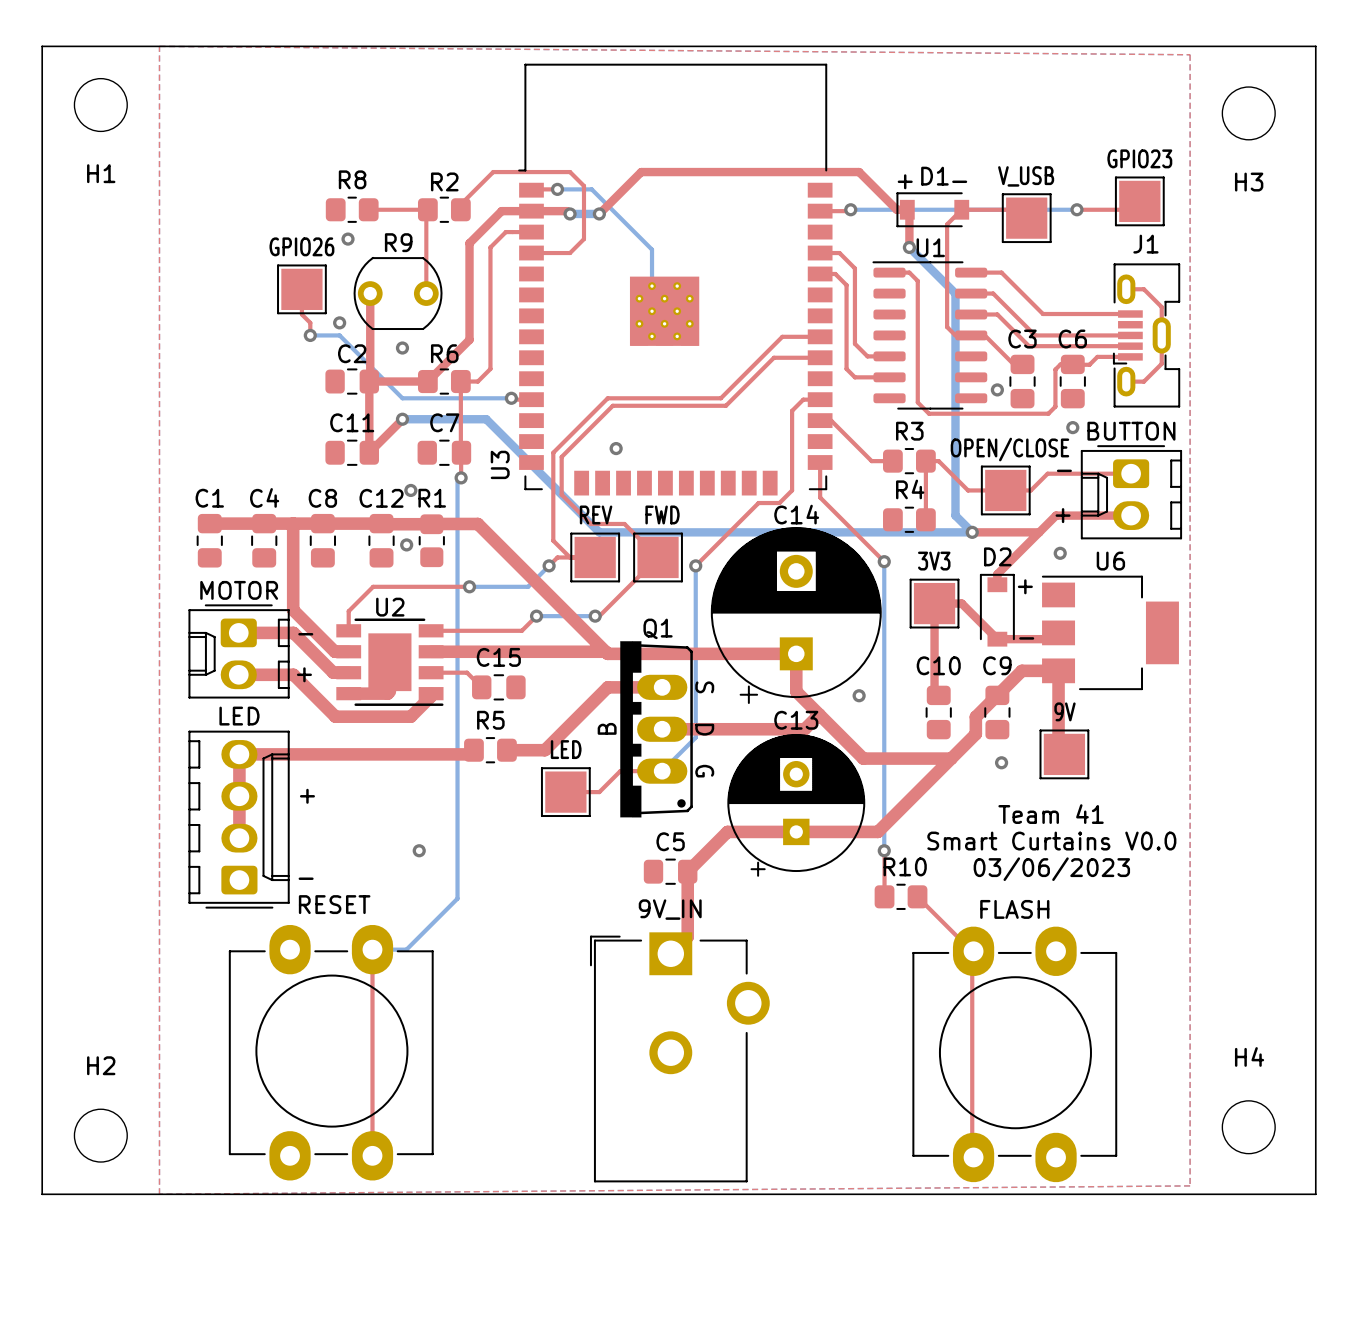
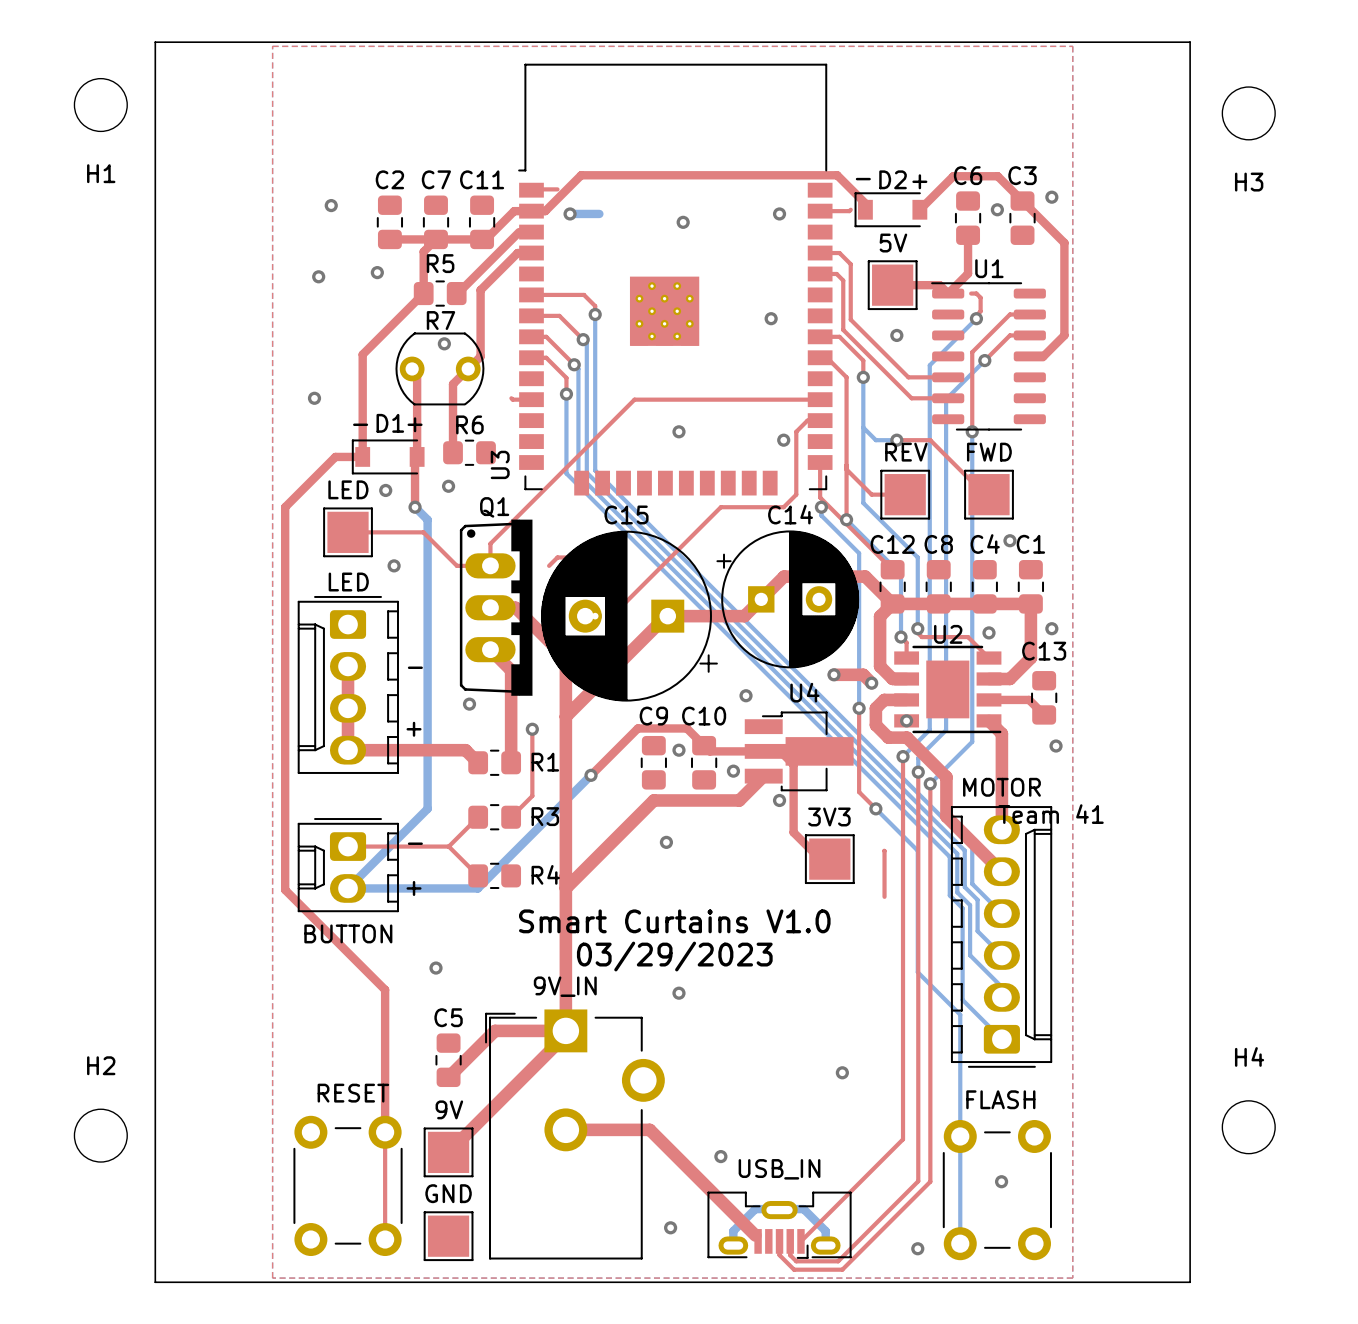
board edge: (42, 46) (1315, 46) (1315, 1194) (42, 1194) (42, 46) -> (155, 42) (155, 1282) (1190, 1282) (1190, 42) (155, 42)
top zone outline: (159, 46) (159, 1194) (1190, 1185) (1190, 54) (159, 46) -> (272, 46) (272, 1278) (1072, 1278) (1072, 46) (272, 46)
text: GPIO23 (1139, 158) -> none
text: V_USB (1026, 176) -> none
D1 text position: + (905, 181) -> + (415, 424)
D1 text position: - (959, 181) -> - (360, 424)
bottom track: (557, 189) (591, 189) (652, 249) (652, 286) -> none
via: (557, 189) -> none
part: (1139, 201) -> none
via: none -> (331, 205)
R8: (352, 209) -> none
top track: (368, 209) (427, 209) (426, 211) (426, 293) -> none
R2: (444, 209) -> none
top track: (460, 209) (460, 204) (493, 172) (570, 172) (583, 185) (583, 239) (570, 253) (531, 253) -> (453, 452) (453, 384) (480, 356) (480, 290) (517, 253) (531, 253)
bottom track: (850, 209) (1076, 209) -> none
via: (850, 209) -> none
top track: none -> (919, 209) (953, 176) (997, 176) (1064, 242) (1064, 335) (1043, 356) (1029, 356)
D1 position: (932, 209) -> (388, 456)
via: none -> (997, 209)
top track: (1076, 209) (1131, 209) -> none
via position: (1076, 209) -> (1051, 197)
top track: (514, 211) (501, 211) (469, 243) (469, 339) (427, 381) (369, 381) -> (514, 211) (485, 239) (389, 239)
top track: (545, 211) (567, 211) (570, 213) -> (545, 211) (581, 175) (837, 175) (865, 203) (865, 209)
top track: (599, 213) (641, 172) (859, 172) (896, 209) (907, 209) (909, 211) (909, 247) -> none
via: (599, 213) -> none
via: none -> (779, 213)
top track: (1026, 213) (1022, 209) (961, 209) (947, 224) (947, 327) (955, 335) (984, 335) (1013, 364) (1022, 364) -> none
part: (1026, 218) -> none
via: none -> (683, 222)
top track: (519, 232) (505, 232) (490, 247) (490, 368) (477, 381) (460, 381) (461, 477) -> (519, 232) (456, 293)
top track: none -> (968, 235) (968, 273) (948, 293) (939, 285) (892, 285)
via: (348, 239) -> none
top track: none -> (435, 239) (423, 251) (423, 293) (362, 354) (362, 456) (335, 456) (285, 507) (285, 889) (385, 989) (385, 1239)
text: GPIO26 (301, 246) -> none
bottom track: (909, 247) (955, 293) (955, 515) (972, 532) (599, 532) (486, 419) (402, 419) -> none
via: (909, 247) -> none
top track: (850, 264) (854, 268) (854, 343) (867, 356) (889, 356) -> (850, 264) (850, 319) (908, 377) (948, 377)
via: none -> (377, 272)
top track: (889, 272) (909, 272) (917, 280) (917, 402) (929, 413) (1048, 413) (1055, 406) (1055, 369) (1060, 364) (1089, 364) (1097, 356) (1130, 356) -> none
top track: (971, 272) (1001, 272) (1042, 314) (1130, 314) -> none
top track: (835, 273) (846, 285) (846, 368) (854, 377) (889, 377) -> (835, 273) (843, 280) (843, 329) (911, 398) (948, 398)
via: none -> (318, 276)
part: none -> (892, 285)
top track: (301, 289) (301, 314) (310, 322) (310, 335) -> none
part: (301, 289) -> none
top track: (1126, 289) (1143, 289) (1161, 307) (1161, 363) (1143, 381) (1126, 381) -> none
top track: (370, 293) (369, 381) -> none
R9: (398, 293) -> none
top track: (976, 293) (993, 293) (1035, 335) (1130, 335) -> (976, 293) (980, 297) (980, 311) (976, 315) (976, 318)
top track: none -> (531, 294) (583, 294) (595, 306) (595, 314)
bottom track: none -> (595, 314) (595, 470) (972, 847) (972, 883) (1001, 913)
via: none -> (595, 314)
top track: (971, 314) (997, 314) (1029, 346) (1130, 346) -> none
top track: none -> (1029, 314) (1009, 314) (972, 352) (972, 431)
top track: none -> (531, 315) (559, 315) (583, 339)
via: none -> (771, 318)
bottom track: none -> (976, 318) (929, 365) (929, 729) (903, 756)
via: none -> (976, 318)
via: (339, 322) -> none
bottom track: (310, 335) (339, 335) (402, 398) (511, 398) -> none
via: (310, 335) -> none
via: none -> (896, 335)
U1 position: (929, 335) -> (988, 356)
top track: none -> (1029, 335) (1009, 335) (984, 360)
J1: (1146, 335) -> none
top track: none -> (531, 336) (546, 336) (574, 364)
top track: (820, 336) (782, 336) (720, 398) (607, 398) (553, 452) (553, 540) (570, 557) -> (820, 336) (839, 336) (863, 360) (863, 377)
bottom track: none -> (583, 339) (586, 343) (586, 472) (964, 850) (964, 887) (977, 899) (977, 931) (1001, 955)
via: none -> (583, 339)
via: none -> (444, 343)
via: (402, 348) -> none
top track: none -> (531, 357) (546, 357) (566, 377) (566, 394)
top track: (820, 357) (773, 357) (725, 405) (612, 405) (561, 456) (561, 494) (591, 523) (624, 523) (658, 557) (599, 616) (595, 616) -> (820, 357) (826, 357) (846, 377) (846, 519)
bottom track: none -> (984, 360) (946, 399) (946, 730) (918, 758) (918, 772)
via: none -> (984, 360)
bottom track: none -> (574, 364) (578, 368) (578, 474) (957, 853) (957, 892) (970, 905) (970, 955) (1001, 987) (1001, 997)
via: none -> (574, 364)
top track: none -> (412, 368) (417, 373) (415, 507)
R7: none -> (439, 368)
bottom track: none -> (863, 377) (863, 503) (917, 557) (917, 628)
via: none -> (863, 377)
C2 rotation: 0° (352, 381) -> 90° clockwise (389, 222)
C2 position: (352, 381) -> (389, 222)
top track: (369, 381) (369, 452) (402, 419) -> none
R6 position: (444, 381) -> (469, 452)
C3 position: (1022, 381) -> (1022, 218)
C6 position: (1072, 381) -> (968, 218)
via: (997, 389) -> none
bottom track: none -> (566, 394) (566, 473) (949, 856) (949, 895) (962, 908) (962, 999) (1001, 1039)
via: none -> (566, 394)
via: none -> (314, 398)
via: (511, 398) -> none
top track: (803, 399) (792, 410) (792, 490) (779, 503) (758, 503) (695, 565) -> (803, 399) (634, 399) (490, 543) (490, 565) (456, 565) (423, 532) (348, 532)
via: (402, 419) -> none
top track: (820, 420) (831, 420) (871, 461) (892, 461) -> (820, 420) (807, 420) (796, 431) (796, 494) (783, 507) (720, 507) (624, 603)
bottom track: none -> (863, 427) (875, 440) (896, 440)
via: (1072, 427) -> none
via: none -> (678, 431)
R3 name position: R3 (909, 431) -> R3 (545, 816)
bottom track: none -> (972, 431) (972, 741) (930, 783)
via: none -> (972, 431)
via: none -> (783, 440)
top track: none -> (896, 440) (930, 440) (989, 498)
via: none -> (896, 440)
via: (616, 448) -> none
text: OPEN/CLOSE (1009, 449) -> none
C11 rotation: 0° (352, 452) -> 90° clockwise (482, 222)
C11 position: (352, 452) -> (482, 222)
C7 rotation: 0° (444, 452) -> 90° clockwise (435, 222)
C7 position: (444, 452) -> (435, 222)
R3 position: (909, 461) -> (494, 817)
top track: none -> (846, 469) (871, 494) (905, 494)
top track: (1131, 473) (1047, 473) (1030, 490) (968, 490) (938, 461) (925, 461) (925, 519) -> none
via position: (461, 477) -> (448, 486)
bottom track: (457, 481) (457, 898) (406, 949) (372, 949) -> none
R4 name position: R4 (910, 489) -> R4 (545, 874)
via: none -> (385, 490)
via: (410, 490) -> none
part: (1005, 490) -> none
part: BUTTON (1131, 492) -> none
part: none -> (905, 494)
part: none -> (989, 494)
bottom track: none -> (415, 507) (427, 519) (427, 808) (348, 888) (477, 888) (591, 775)
via: none -> (415, 507)
bottom track: none -> (821, 507) (821, 515) (859, 553) (859, 708)
via: none -> (821, 507)
text: REV (596, 514) -> none
text: FWD (662, 514) -> none
top track: (1131, 515) (1056, 515) (997, 574) (997, 584) -> none
bottom track: none -> (846, 519) (901, 574) (901, 637)
via: none -> (846, 519)
R4 position: (909, 519) -> (494, 875)
top track: (209, 523) (477, 523) (607, 653) (796, 653) (796, 691) (863, 758) (951, 758) -> none
top track: (293, 523) (293, 610) (334, 651) (348, 651) -> none
C14 footprint: [710, 527, 882, 704] -> [716, 530, 860, 669]
part: none -> (348, 532)
top track: (972, 532) (1039, 532) -> none
via: (972, 532) -> none
C1 position: (209, 540) -> (1030, 586)
C4 position: (264, 540) -> (984, 586)
C8 position: (322, 540) -> (938, 586)
C12 position: (381, 540) -> (892, 586)
R1 rotation: 0° (431, 540) -> 90° clockwise (494, 762)
R1 position: (431, 540) -> (494, 762)
via: none -> (1009, 540)
via: (406, 544) -> none
via: (1060, 553) -> none
part: (595, 557) -> none
part: (658, 557) -> none
bottom track: (884, 561) (884, 850) -> none
via: (884, 561) -> none
text: 3V3 (934, 561) -> none
via: none -> (394, 565)
bottom track: (549, 565) (528, 586) (469, 586) -> none
via: (549, 565) -> none
bottom track: (695, 565) (695, 737) (662, 771) -> none
via: (695, 565) -> none
D2 footprint: [979, 573, 1015, 647] -> [854, 192, 928, 228]
top track: (469, 586) (373, 586) (348, 611) (348, 630) -> none
via: (469, 586) -> none
top track: none -> (892, 603) (1030, 603) (1030, 658) (1009, 678) (989, 678)
top track: none -> (892, 603) (865, 576) (784, 576) (744, 616) (666, 616) (565, 716)
top track: none -> (892, 603) (880, 616) (880, 666) (892, 678) (906, 678)
part: (934, 603) -> none
top track: none -> (490, 607) (515, 607) (565, 658) (565, 1035) (448, 1152)
top track: (536, 616) (521, 630) (431, 630) -> none
bottom track: (536, 616) (595, 616) -> none
via: (536, 616) -> none
top track: none -> (917, 628) (917, 632) (921, 637) (968, 637) (989, 658)
via: none -> (917, 628)
via: none -> (1051, 628)
top track: (238, 632) (293, 632) (333, 672) (348, 672) -> none
via: none -> (989, 632)
top track: (1058, 632) (1052, 639) (997, 639) (961, 603) (934, 603) (934, 691) (938, 695) -> none
U6: (1110, 632) -> none
top track: none -> (901, 637) (906, 642) (906, 658)
via: none -> (901, 637)
Q1 footprint: [620, 641, 693, 818] -> [459, 519, 533, 696]
top track: none -> (490, 649) (511, 670) (511, 762)
part: MOTOR (239, 651) -> none
top track: (431, 651) (605, 651) -> none
C15 name position: C15 (498, 657) -> C15 (626, 514)
U2 position: (389, 662) -> (947, 689)
top track: none -> (348, 666) (348, 750) (465, 750) (478, 762)
top track: (431, 672) (467, 672) (481, 687) -> none
top track: (238, 674) (293, 674) (335, 716) (410, 716) (431, 696) (431, 693) -> none
C15 footprint: [472, 674, 526, 701] -> [541, 530, 718, 702]
top track: none -> (833, 674) (863, 674) (871, 683)
via: none -> (833, 674)
via: none -> (871, 683)
part: none -> LED (348, 684)
top track: (662, 687) (607, 687) (544, 750) (506, 750) -> none
top track: (389, 691) (387, 693) (348, 693) -> none
via: none -> (746, 695)
via: (859, 695) -> none
top track: none -> (906, 699) (884, 699) (875, 708) (875, 725) (888, 737) (906, 737) (946, 777) (946, 816) (1001, 871)
top track: none -> (989, 699) (1029, 699) (1044, 714)
via: none -> (469, 704)
top track: none -> (859, 708) (859, 792) (875, 808)
via: none -> (859, 708)
text: 9V (1065, 711) -> none
C10 position: (938, 712) -> (704, 762)
C9 position: (997, 712) -> (653, 762)
top track: (819, 714) (804, 729) (662, 729) -> none
C13 name position: C13 (796, 720) -> C13 (1044, 651)
via: none -> (906, 720)
top track: none -> (989, 720) (1001, 733) (1001, 829)
top track: none -> (532, 729) (532, 796) (511, 817)
via: none -> (532, 729)
C13 footprint: [727, 734, 866, 877] -> [1031, 671, 1058, 725]
via: none -> (1056, 746)
text: LED (566, 749) -> none
top track: (473, 750) (469, 754) (239, 754) (239, 838) -> none
R5 position: (490, 750) -> (440, 293)
via: none -> (678, 750)
top track: none -> (780, 751) (793, 764) (793, 832) (820, 859) (829, 859)
top track: none -> (789, 751) (709, 751) (686, 728) (637, 728) (591, 775)
U4: none -> (799, 751)
top track: (1064, 754) (1058, 748) (1058, 670) (1021, 670) (975, 716) (975, 734) (877, 831) (727, 831) (687, 871) (687, 936) (670, 953) -> none
part: (1064, 754) -> none
top track: none -> (903, 756) (903, 1139) (800, 1241)
via: none -> (903, 756)
via: (1001, 762) -> none
top track: (662, 771) (620, 771) (599, 792) (565, 792) -> none
via: none -> (733, 771)
top track: none -> (918, 772) (918, 1181) (838, 1261) (796, 1261) (790, 1255) (790, 1241)
via: none -> (918, 772)
via: none -> (591, 775)
top track: none -> (763, 776) (739, 800) (653, 800) (565, 888)
top track: none -> (930, 783) (930, 1181) (842, 1269) (794, 1269) (779, 1255) (779, 1241)
via: none -> (930, 783)
part: (565, 792) -> none
via: none -> (779, 800)
bottom track: none -> (875, 808) (917, 850) (917, 972) (960, 1014) (960, 1243)
via: none -> (875, 808)
top track: none -> (478, 817) (448, 846)
part: LED (239, 819) -> none
text: Smart Curtains V0.0 (1051, 841) -> none
via: none -> (666, 842)
top track: none -> (348, 846) (448, 846)
top track: none -> (448, 846) (478, 875)
via: (419, 850) -> none
via: (884, 850) -> none
part: none -> (829, 859)
part: none -> BUTTON (348, 865)
text: 03/06/2023 (1051, 869) -> none
C5 rotation: 0° (670, 871) -> 90° clockwise (448, 1060)
C5 position: (670, 871) -> (448, 1060)
R10: (901, 896) -> none
top track: (917, 896) (973, 951) -> none
text: none -> Smart Curtains V1.0 (674, 921)
part: none -> (1001, 936)
top track: (972, 948) (972, 1154) -> none
top track: (372, 949) (372, 1155) -> none
text: none -> 03/29/2023 (674, 956)
via: none -> (435, 968)
via: none -> (678, 993)
top track: none -> (565, 1030) (495, 1030) (448, 1077)
part: RESET (331, 1052) -> none
part: FLASH (1014, 1054) -> none
part position: (679, 1057) -> (574, 1134)
via: none -> (842, 1072)
top track: none -> (565, 1129) (649, 1129) (755, 1235)
part: none -> (448, 1152)
via: none -> (720, 1156)
via: none -> (1001, 1181)
part: none -> (348, 1185)
part: none -> (997, 1190)
part: none -> (779, 1225)
via: none -> (670, 1227)
part: none -> (448, 1236)
bottom track: none -> (733, 1244) (733, 1231) (755, 1209) (803, 1209) (825, 1231) (825, 1244)
via: none -> (917, 1248)

